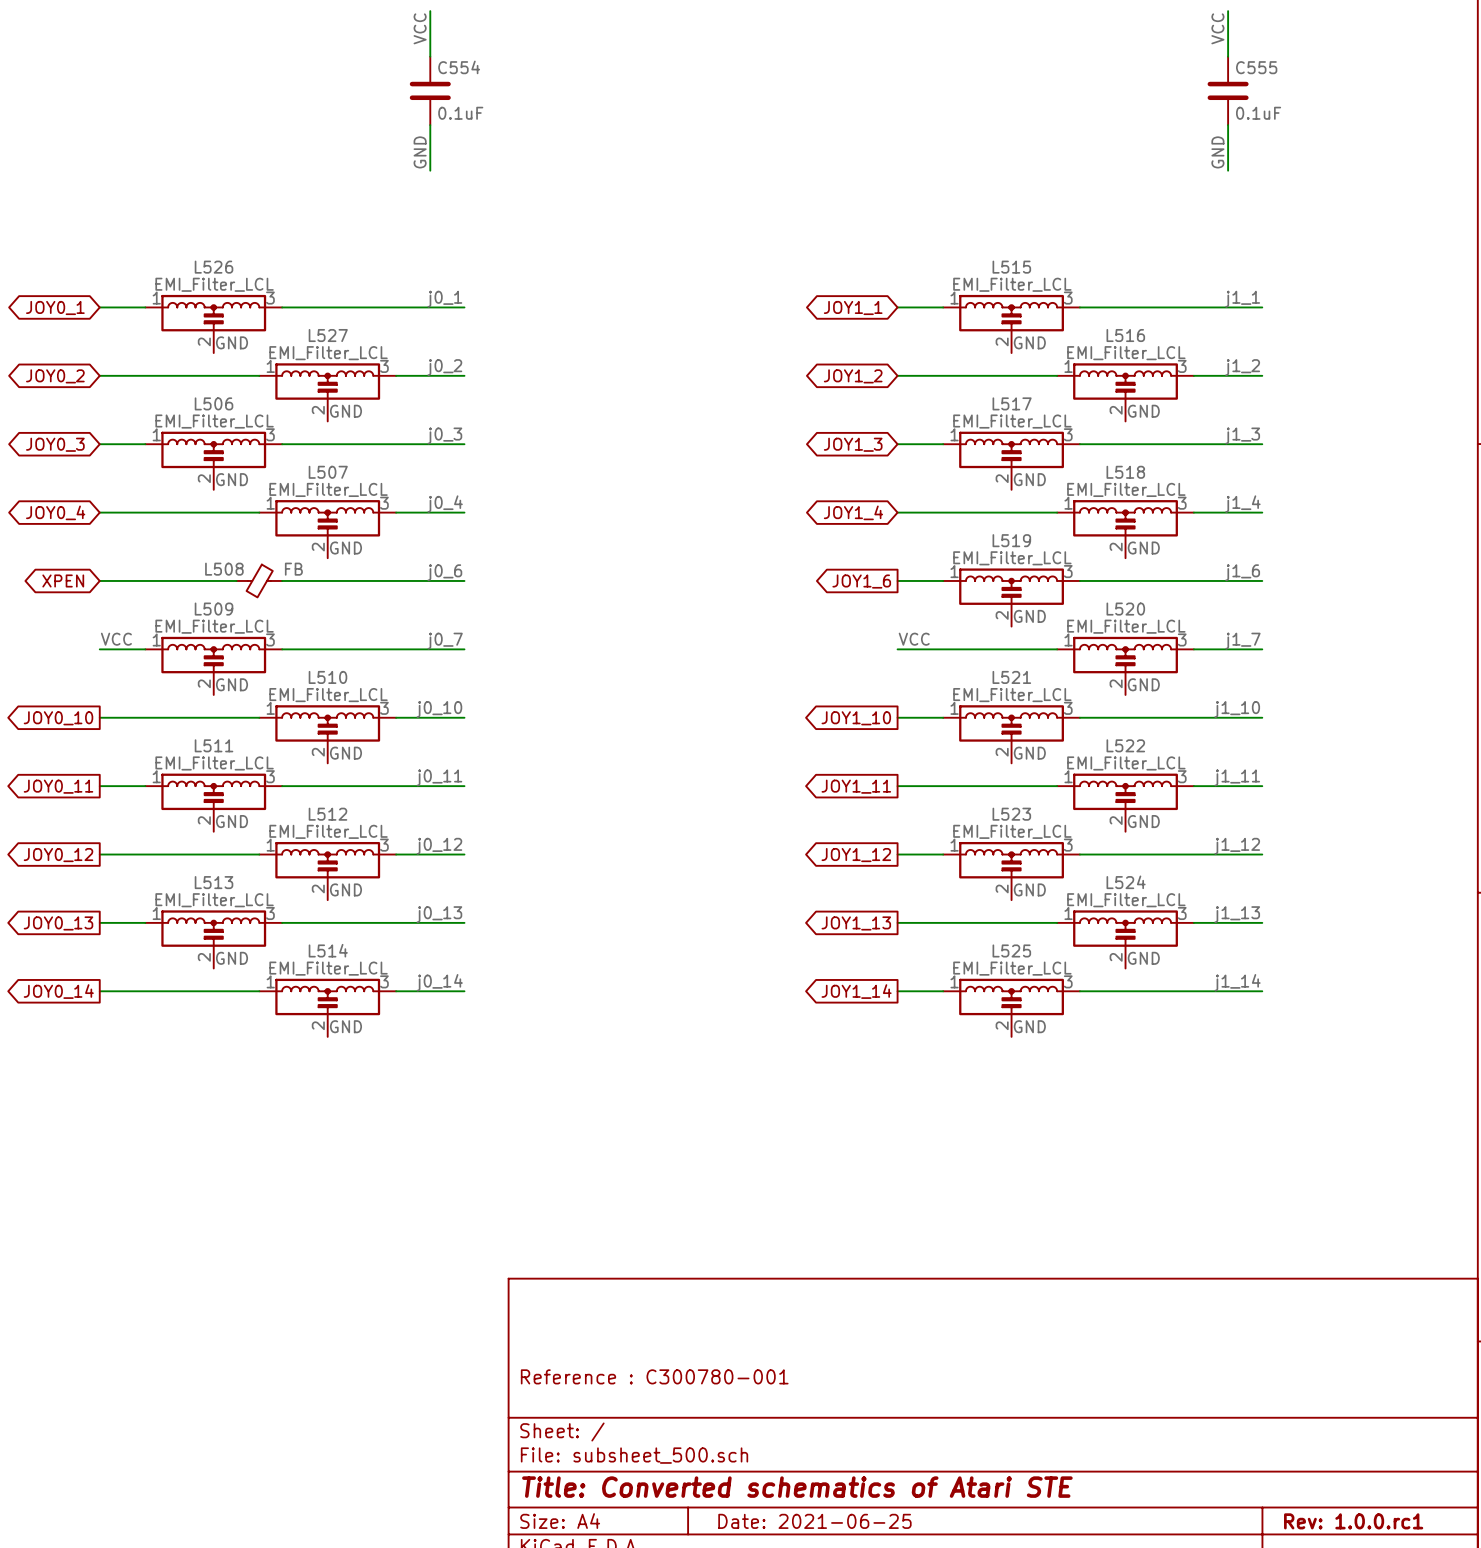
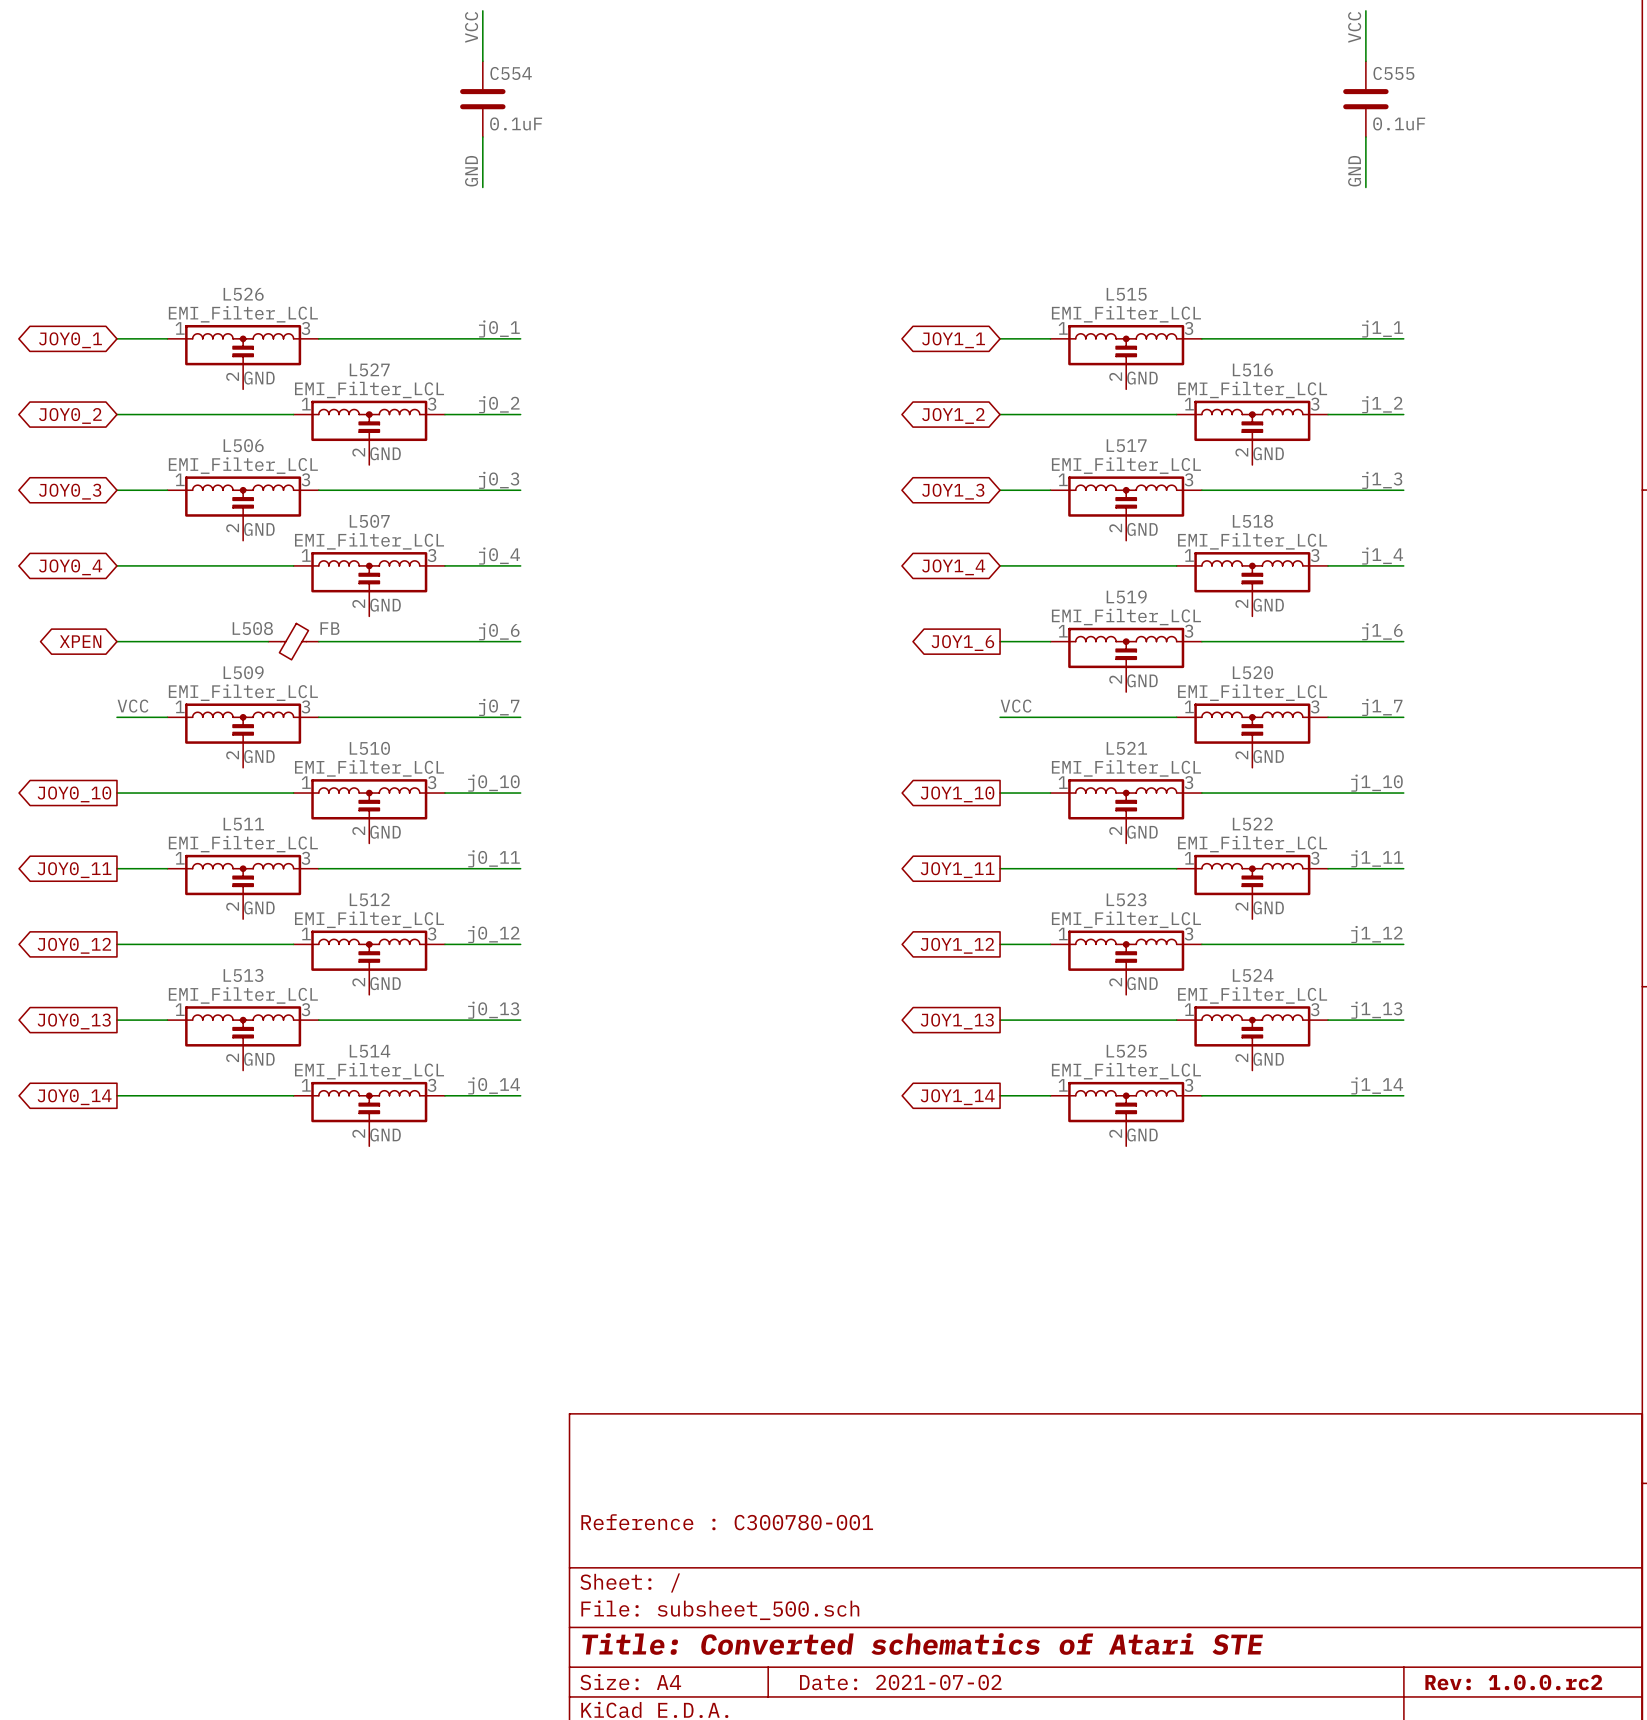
title block: Date: 2021-06-25 (814, 1521) -> Date: 2021-07-02 (900, 1682)
title block: Rev: 1.0.0.rc1 (1353, 1521) -> Rev: 1.0.0.rc2 (1513, 1682)

